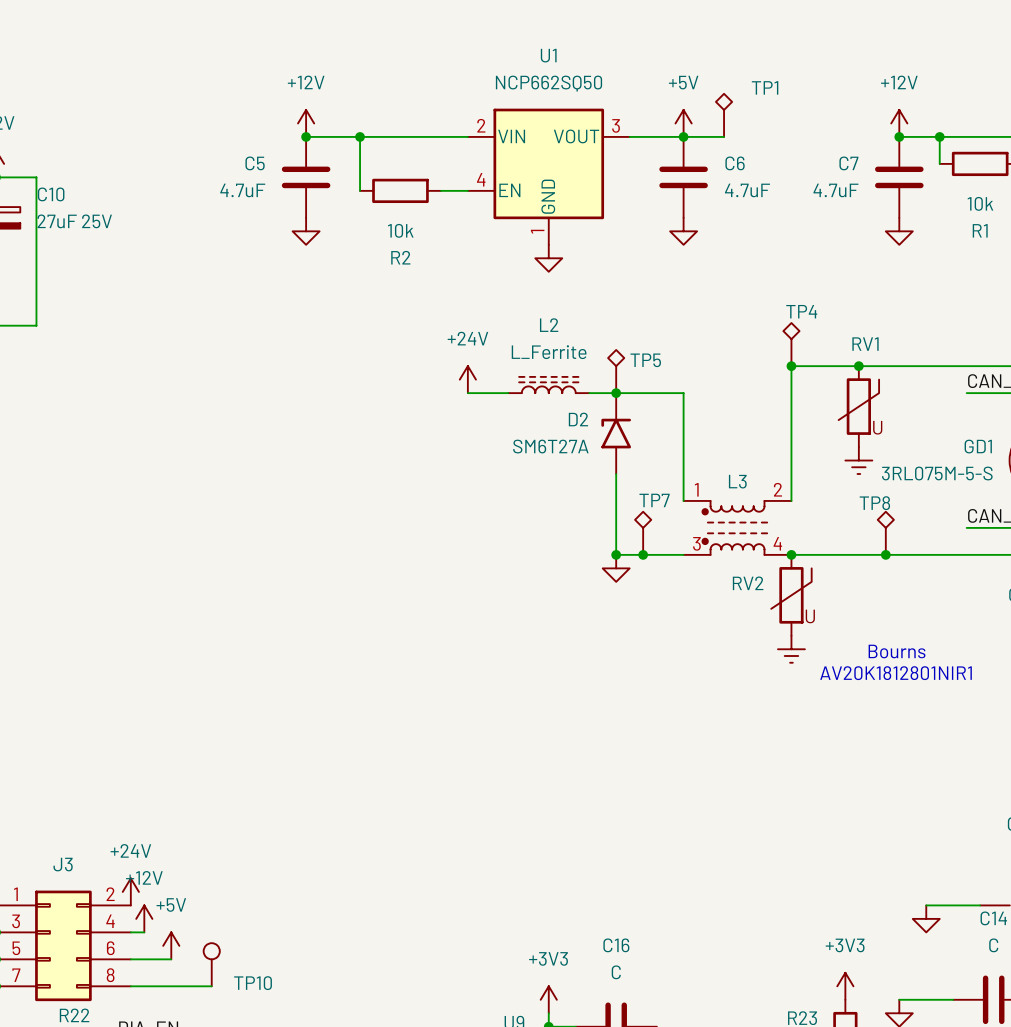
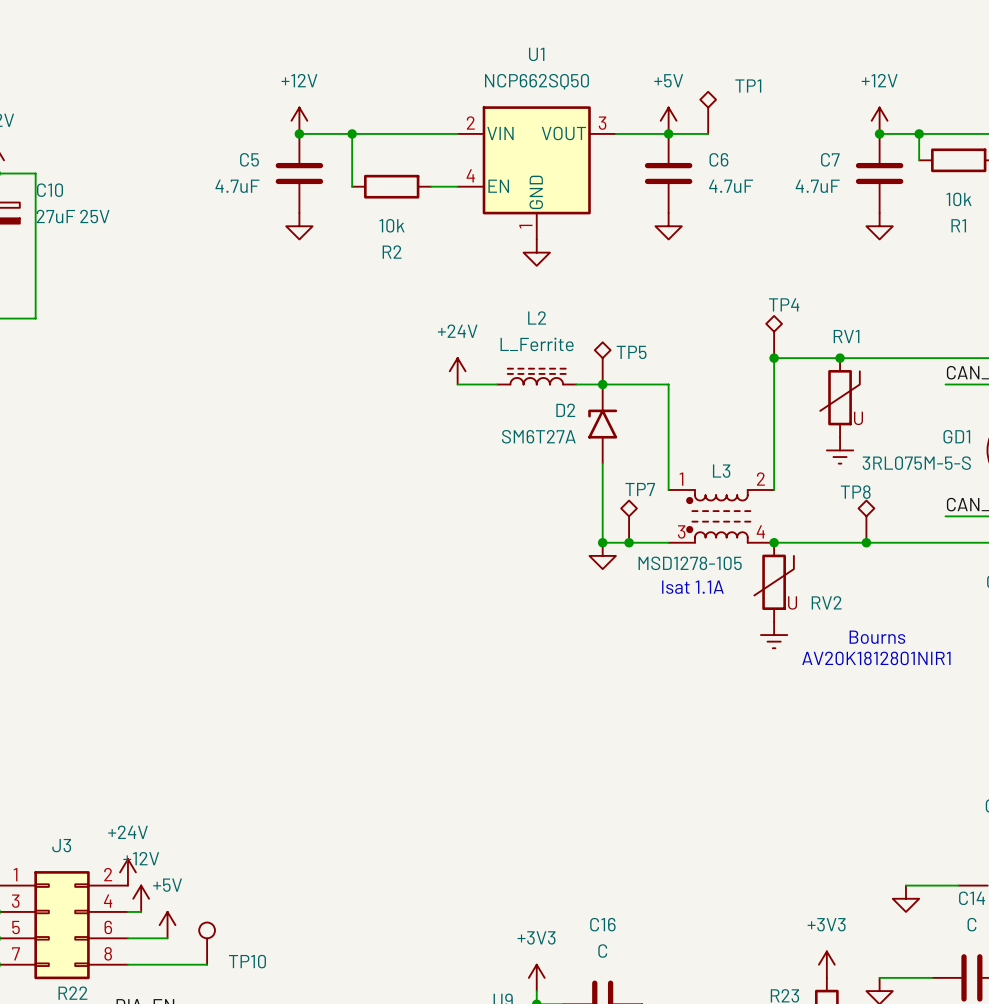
L3 value: none -> MSD1278-105 (690, 563)
RV2 name position: RV2 (748, 583) -> RV2 (826, 602)
text: none -> Isat 1.1A (692, 587)

